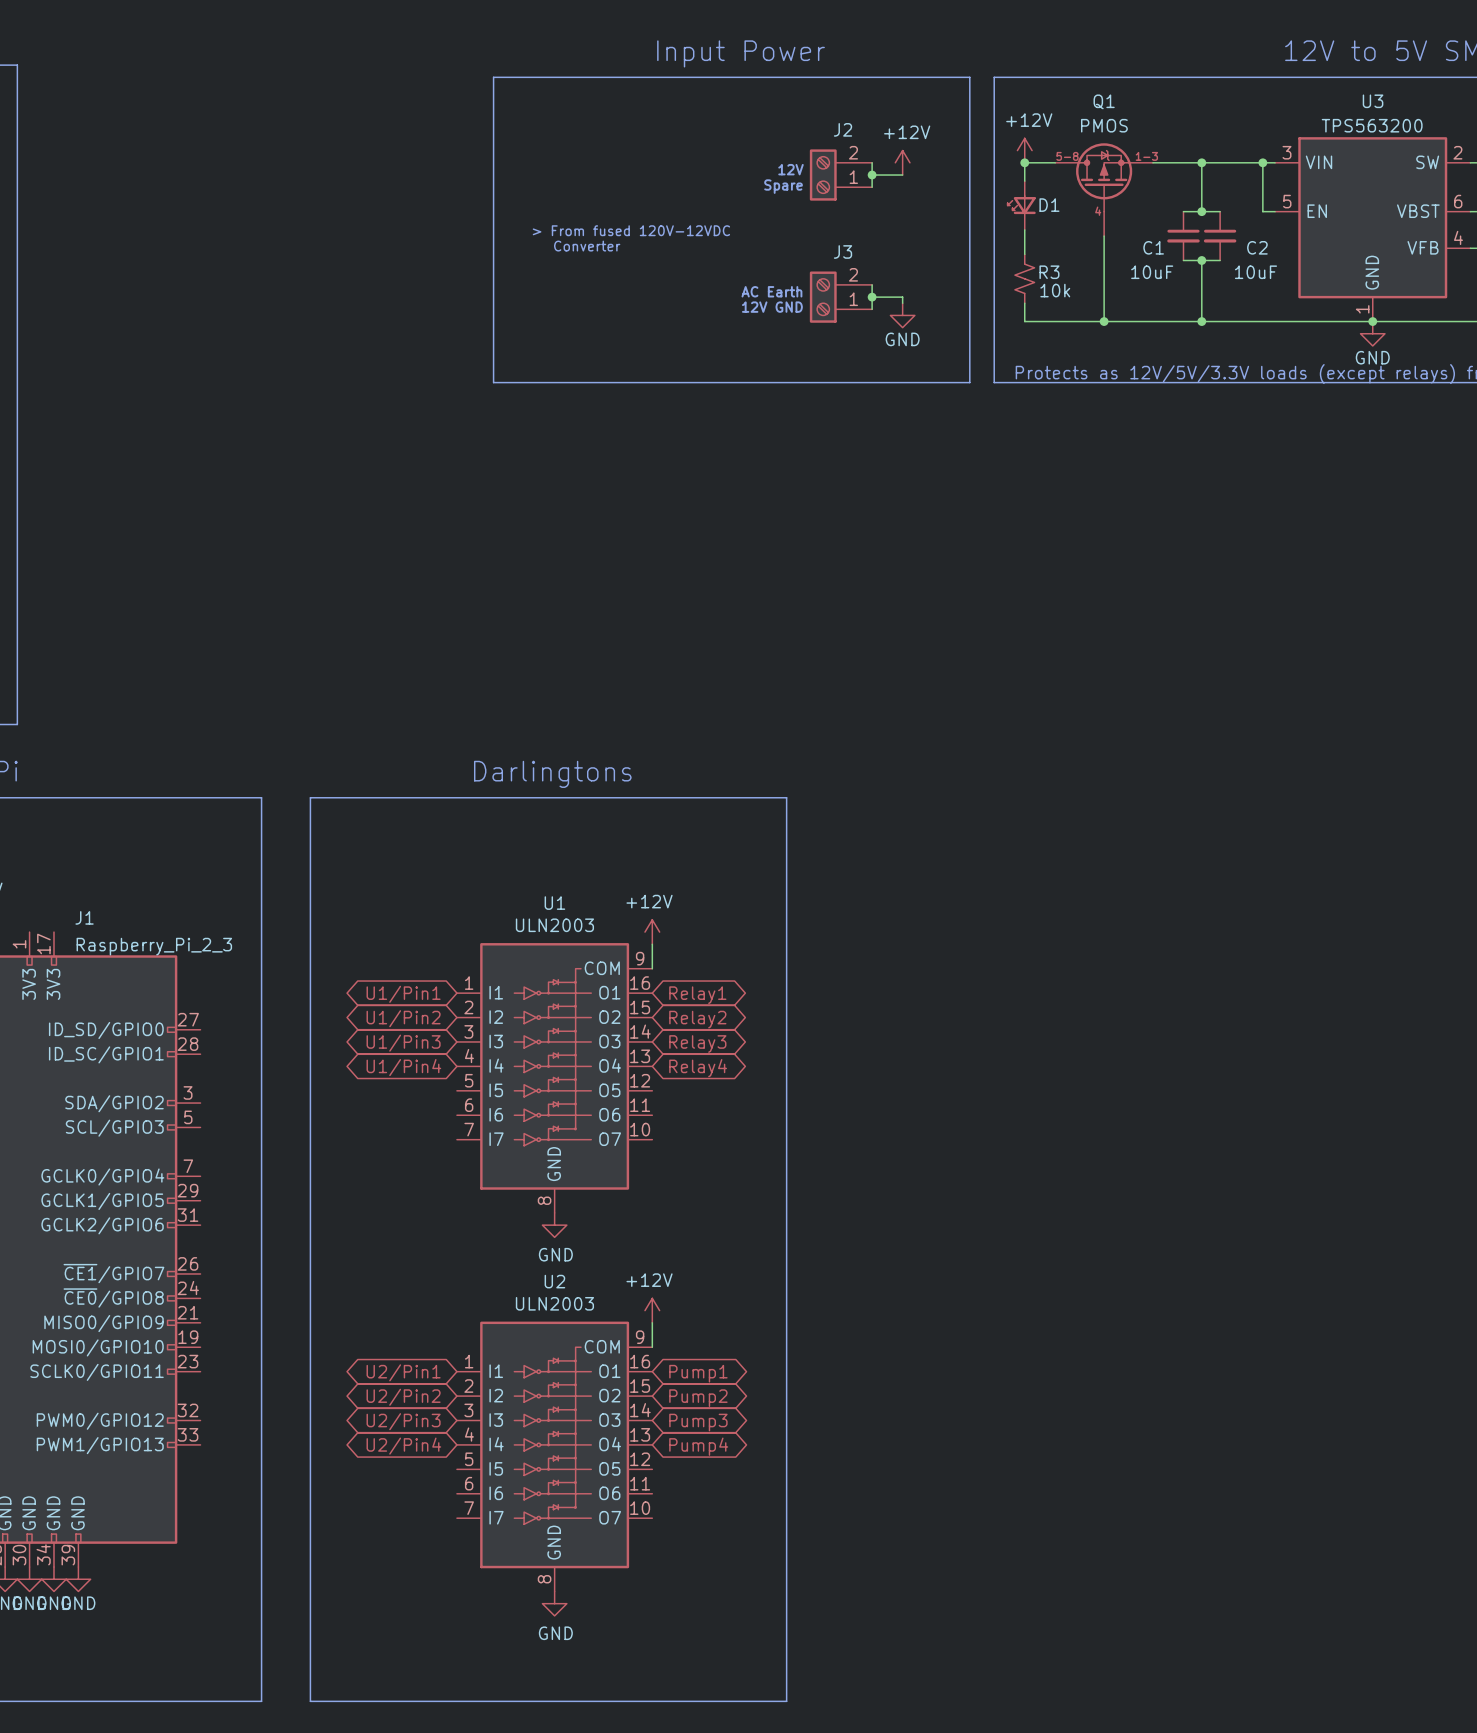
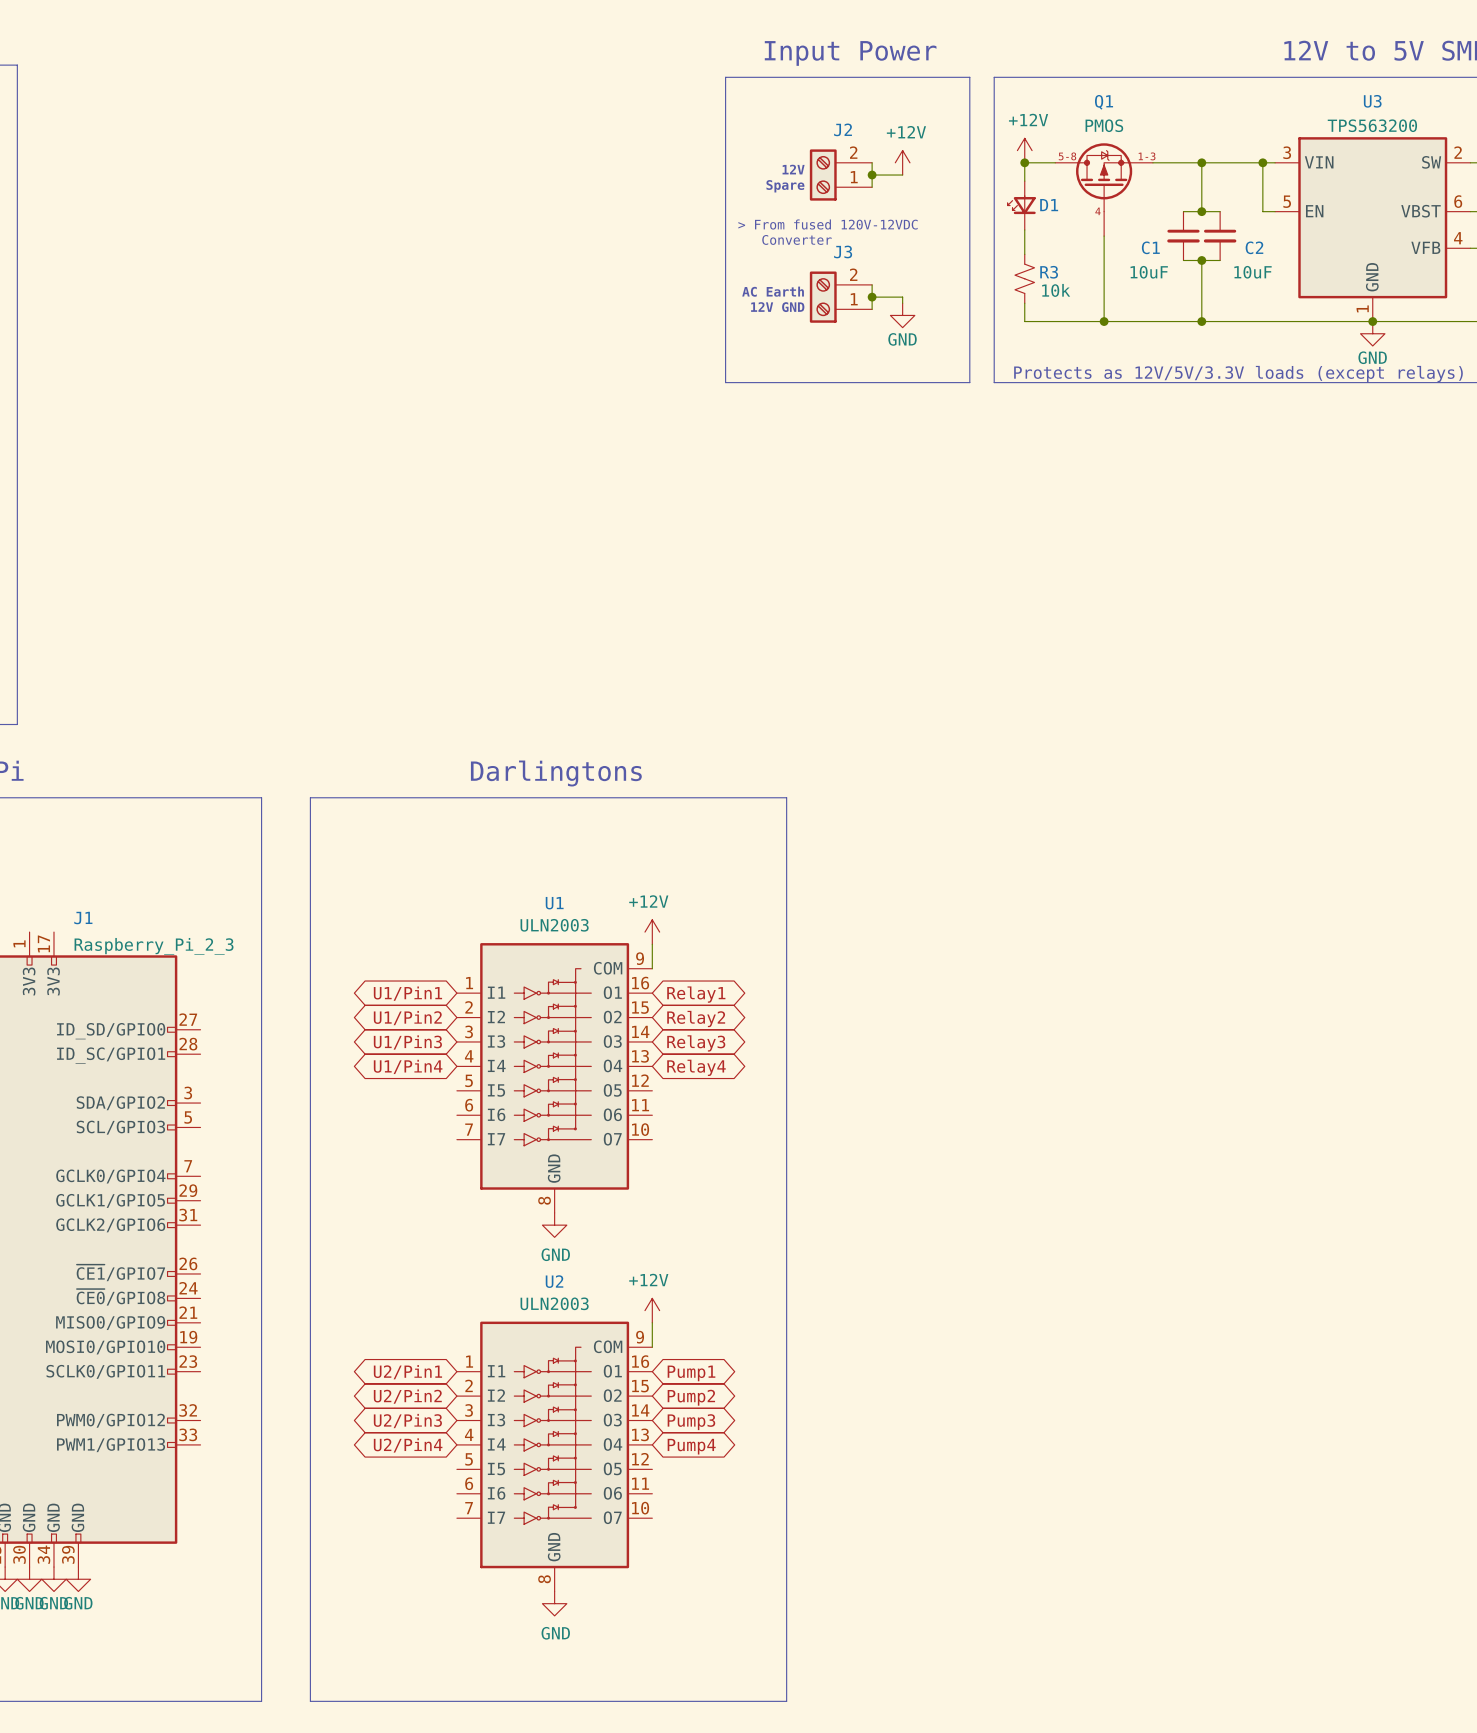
text position: Input Power (741, 53) -> Input Power (850, 53)
line: (725, 77) (493, 77) (493, 382) (725, 382) -> (725, 77) (725, 382)
text position: > From fused 120V-12VDC (631, 230) -> > From fused 120V-12VDC (828, 224)
text position: Converter (587, 246) -> Converter (796, 239)

